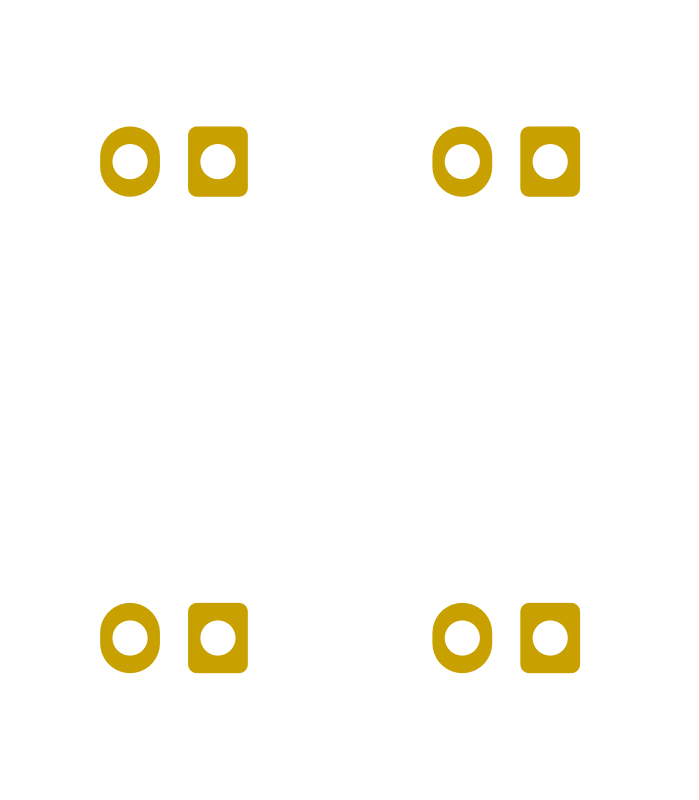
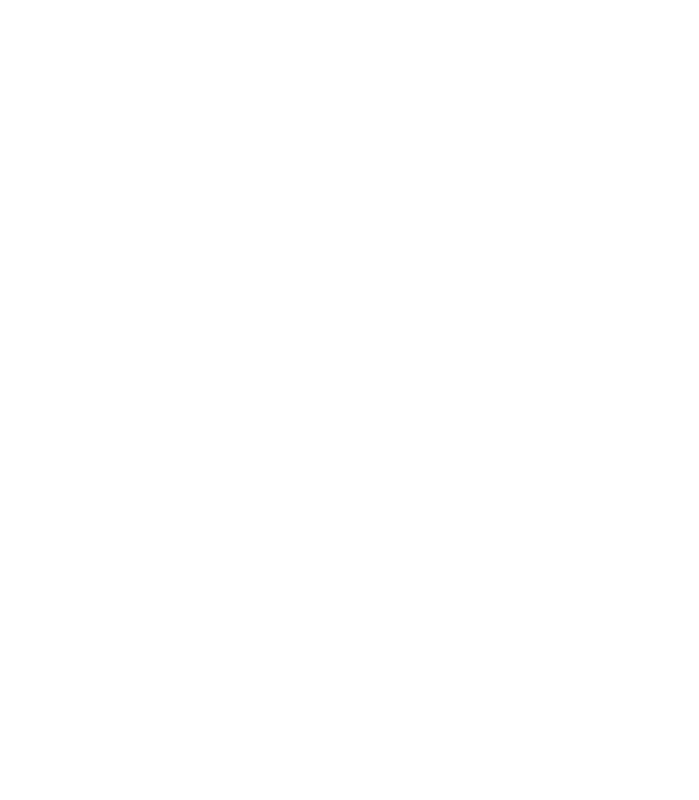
part: (174, 161) -> none
part: (506, 161) -> none
part: (174, 638) -> none
part: (506, 638) -> none

